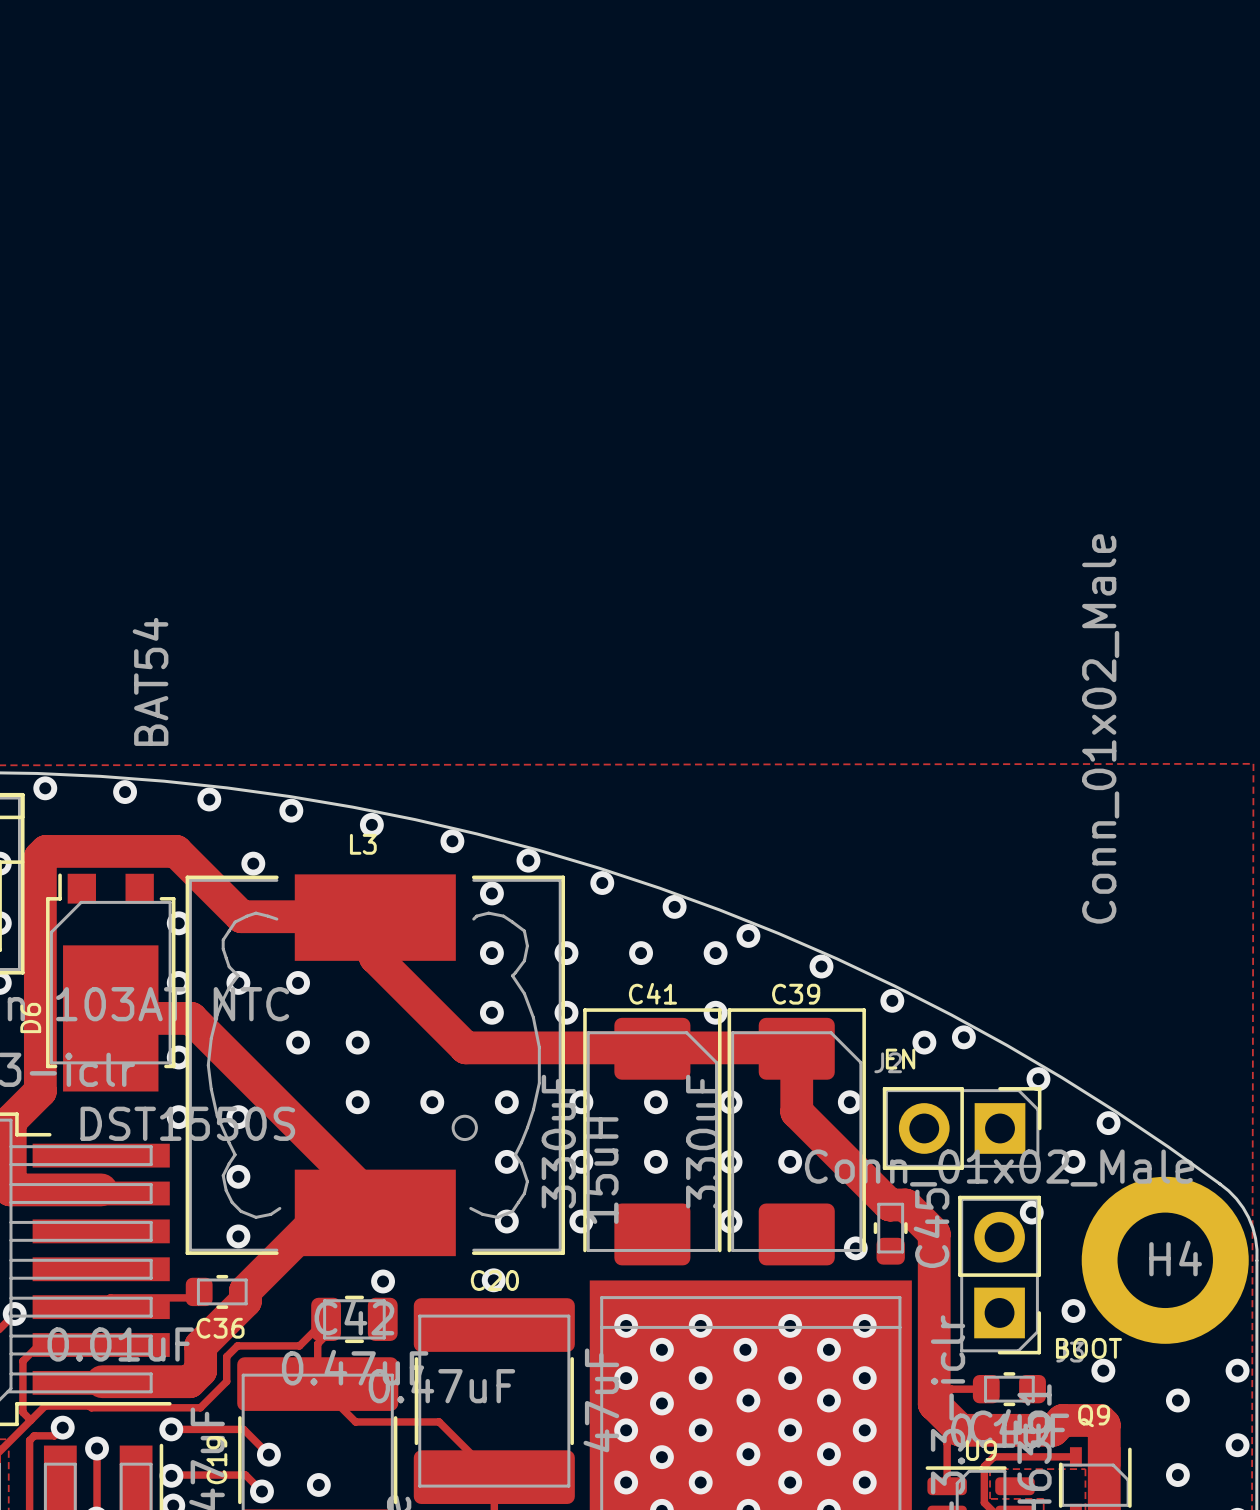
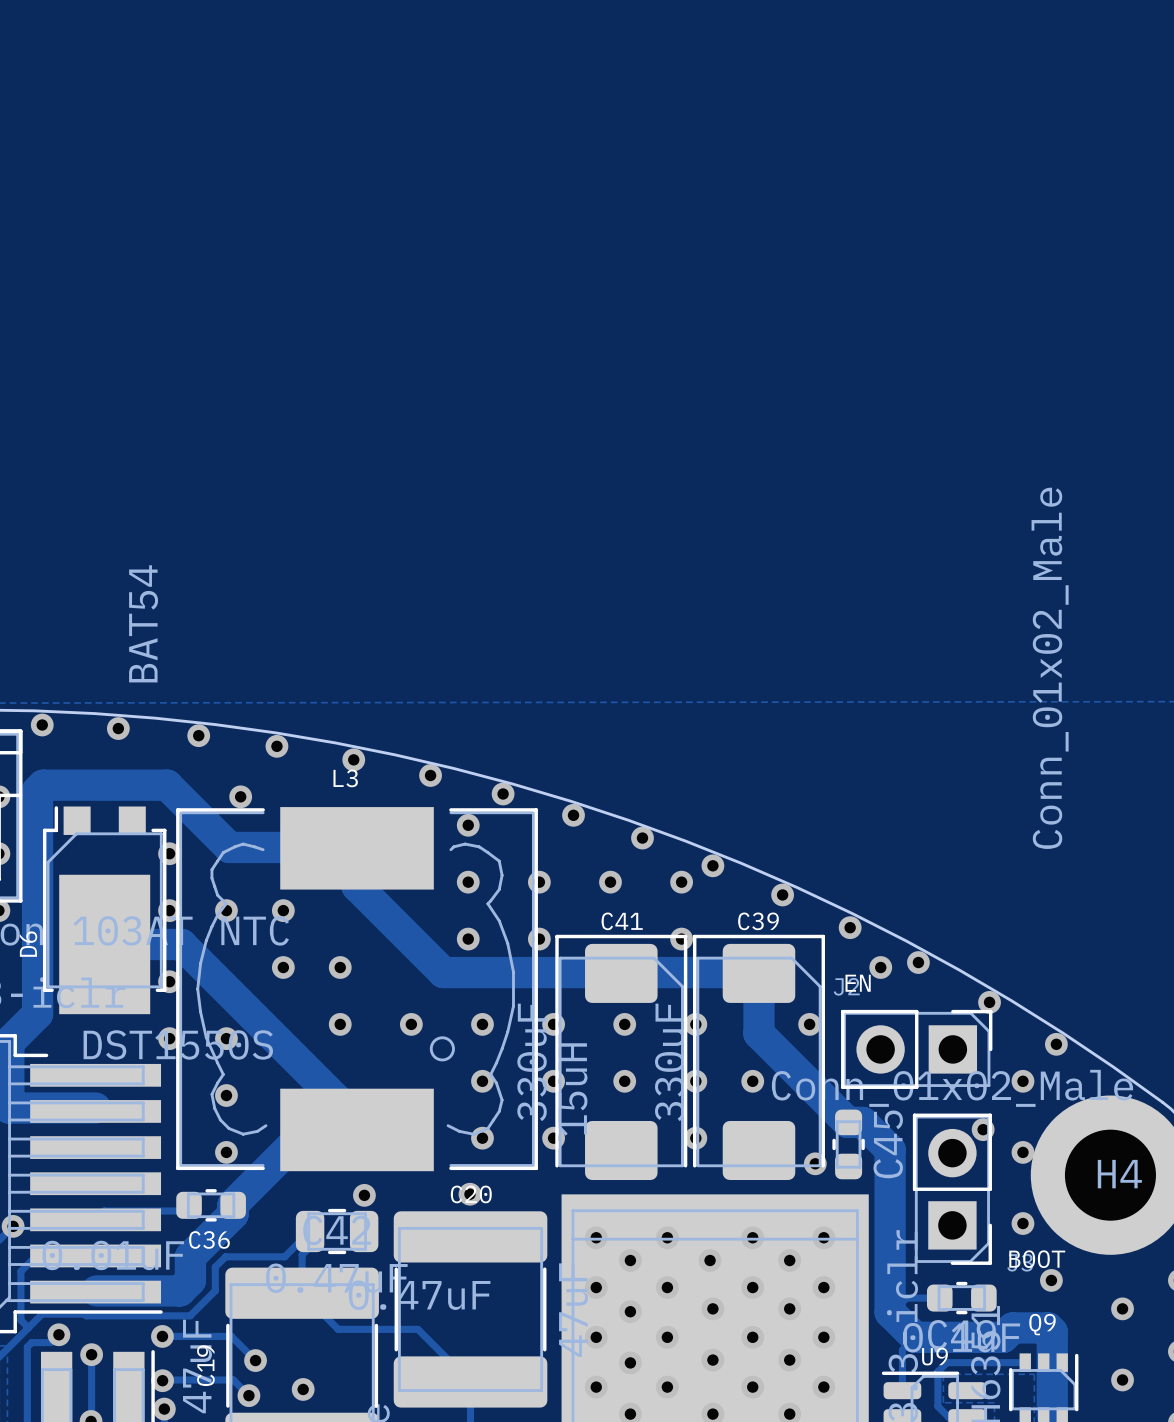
via: none -> (1022, 1152)

